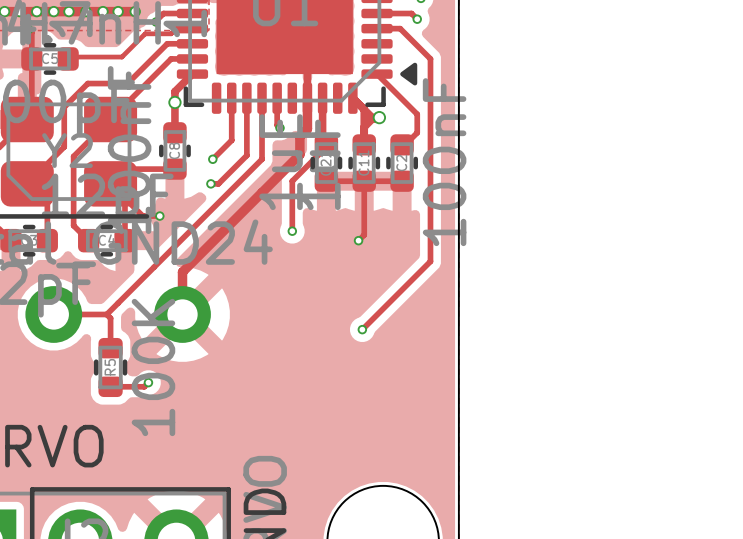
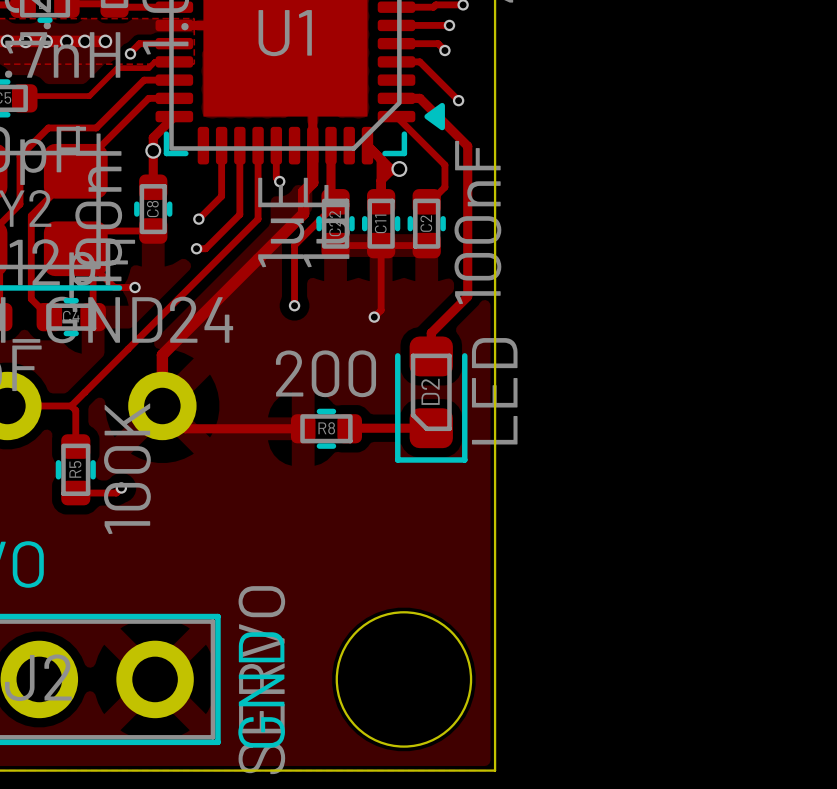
track: (396, 28) (400, 28) (430, 58) (430, 261) (362, 329) -> (419, 61) (458, 100)
track: none -> (396, 98) (419, 98) (467, 146) (467, 296) (431, 333) (431, 356)
via: none -> (458, 100)
D2: none -> LED (431, 399)
track: none -> (162, 405) (185, 428) (303, 428)
via: (362, 329) -> none
track: none -> (350, 428) (431, 428)
R8: none -> 200 (326, 428)

